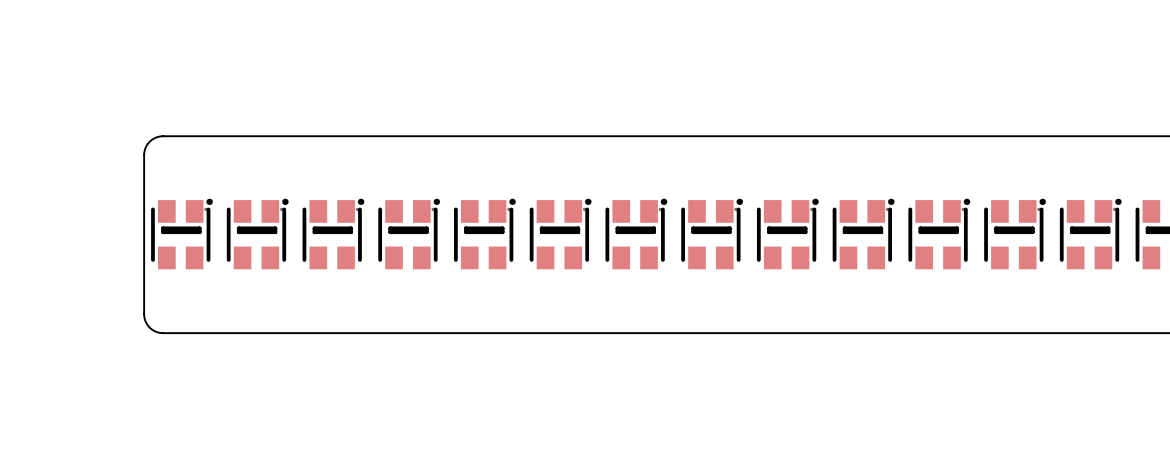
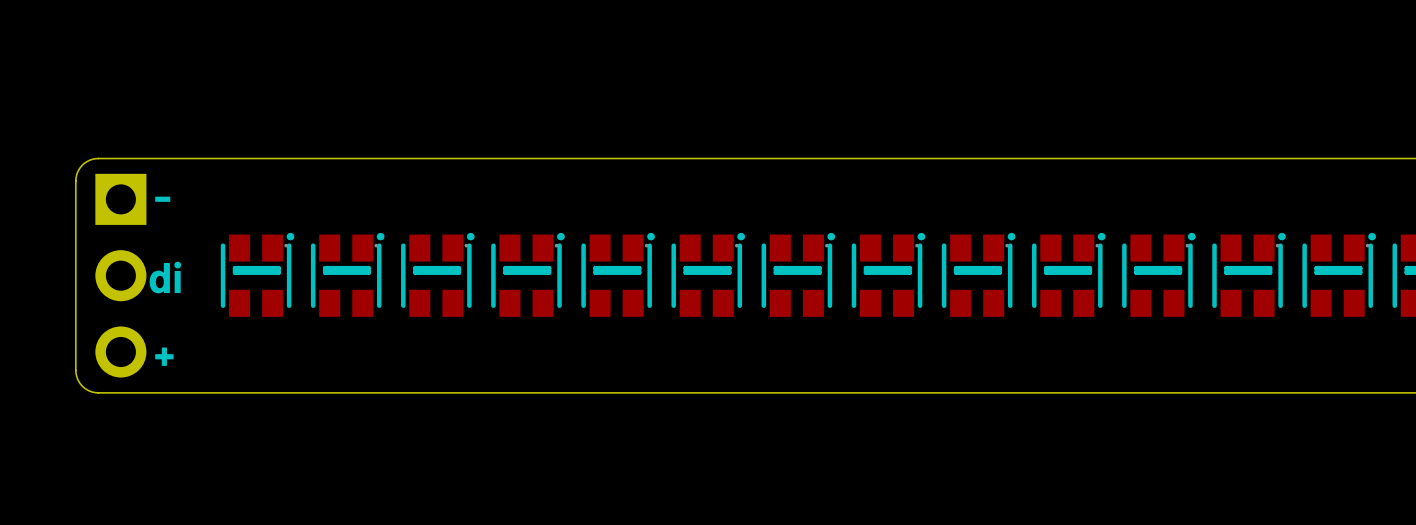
board edge: (163, 136) (149, 141) (144, 155) (144, 316) (151, 329) (163, 333) -> (235, 158) (95, 158) (87, 161) (80, 167) (75, 181) (75, 370) (80, 384) (89, 391) (98, 392) (235, 392)
text: none -> - (162, 199)
part: none -> (120, 275)
text: none -> di (165, 277)
text: none -> + (164, 356)

